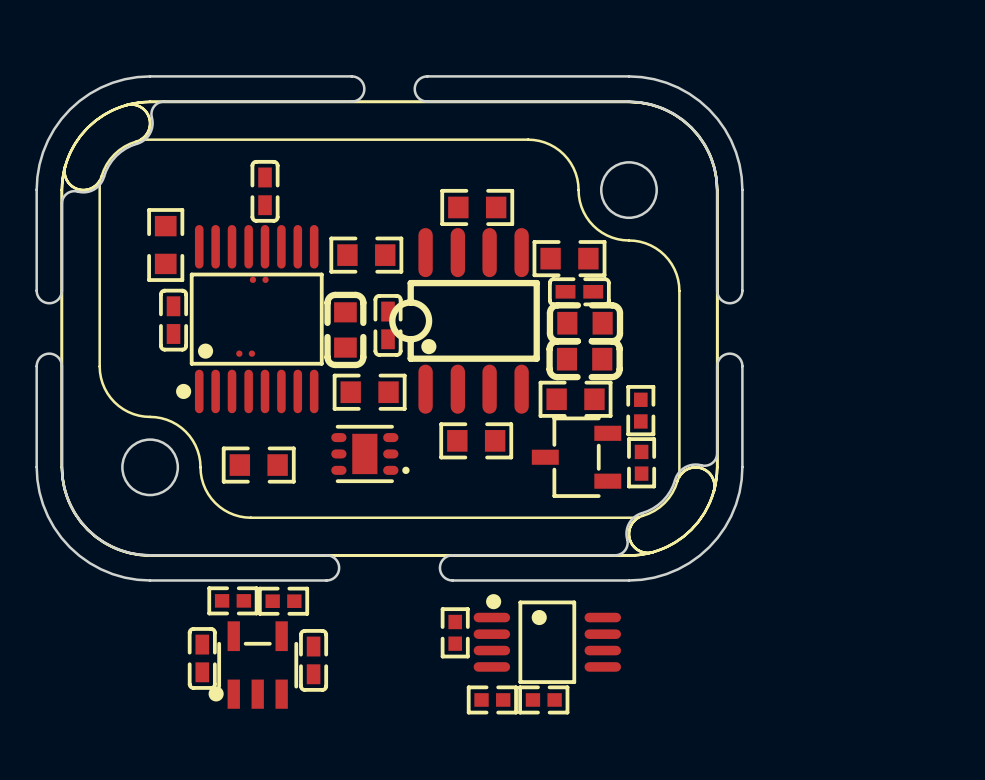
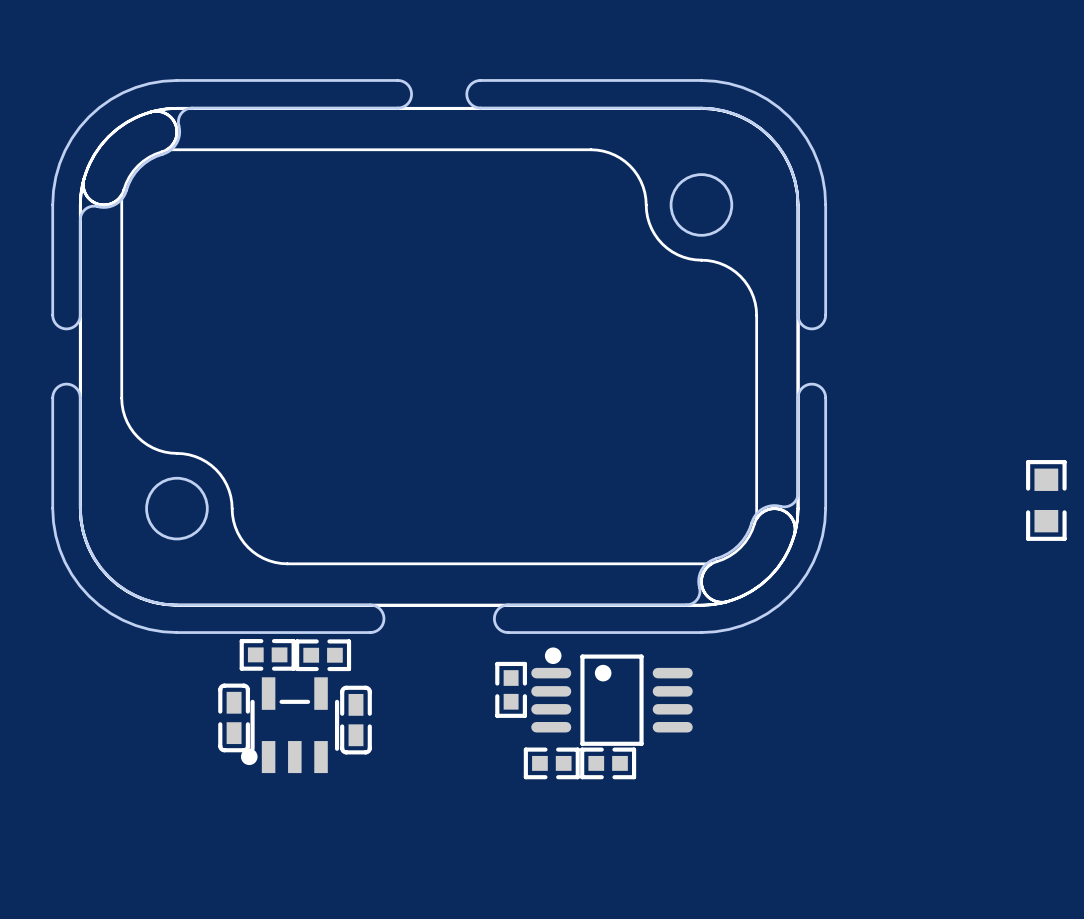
part: (265, 191) -> none
part: (477, 207) -> none
part: (165, 245) -> none
part: (366, 255) -> none
part: (569, 258) -> none
part: (259, 279) -> none
part: (579, 291) -> none
part: (249, 319) -> none
part: (173, 320) -> none
part: (464, 320) -> none
part: (584, 323) -> none
part: (388, 325) -> none
part: (345, 329) -> none
part: (245, 353) -> none
part: (584, 359) -> none
part: (369, 392) -> none
part: (575, 399) -> none
part: (640, 410) -> none
part: (476, 440) -> none
part: (370, 453) -> none
part: (576, 457) -> none
part: none -> (1046, 500)
part: (641, 462) -> none
part: (258, 465) -> none

